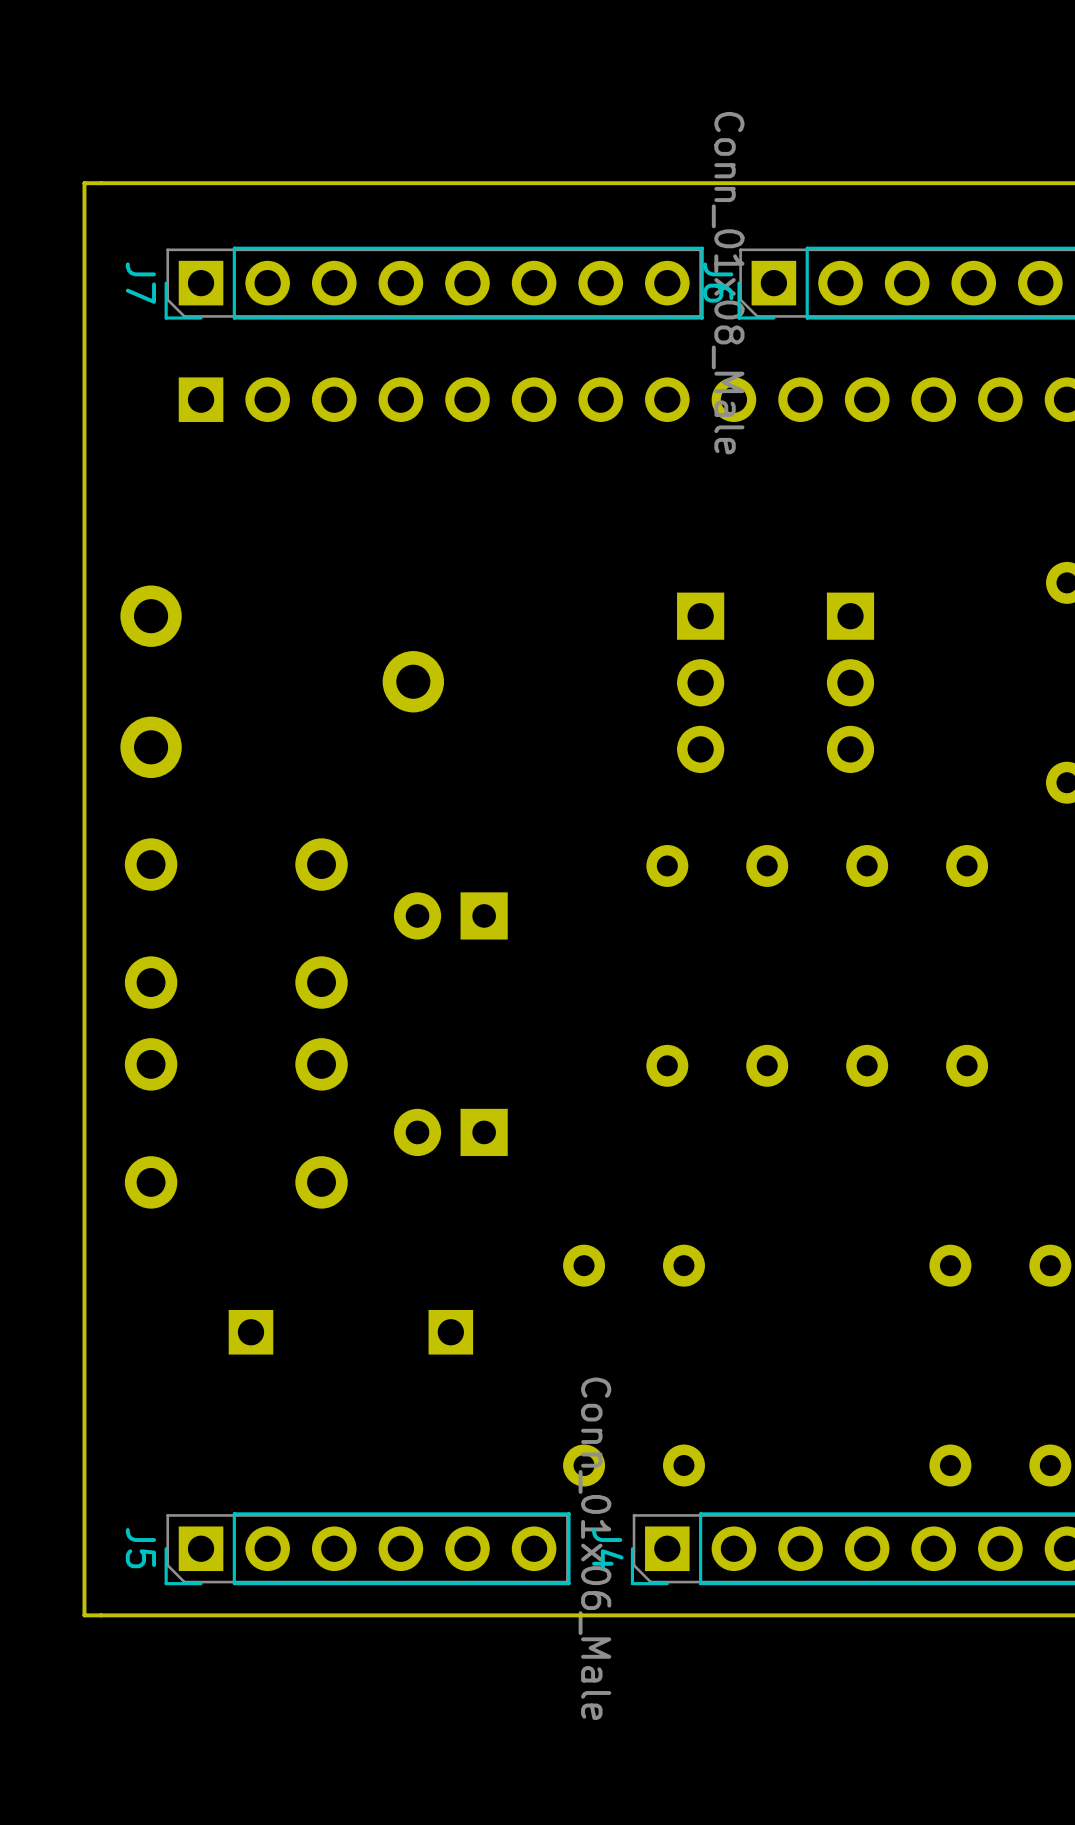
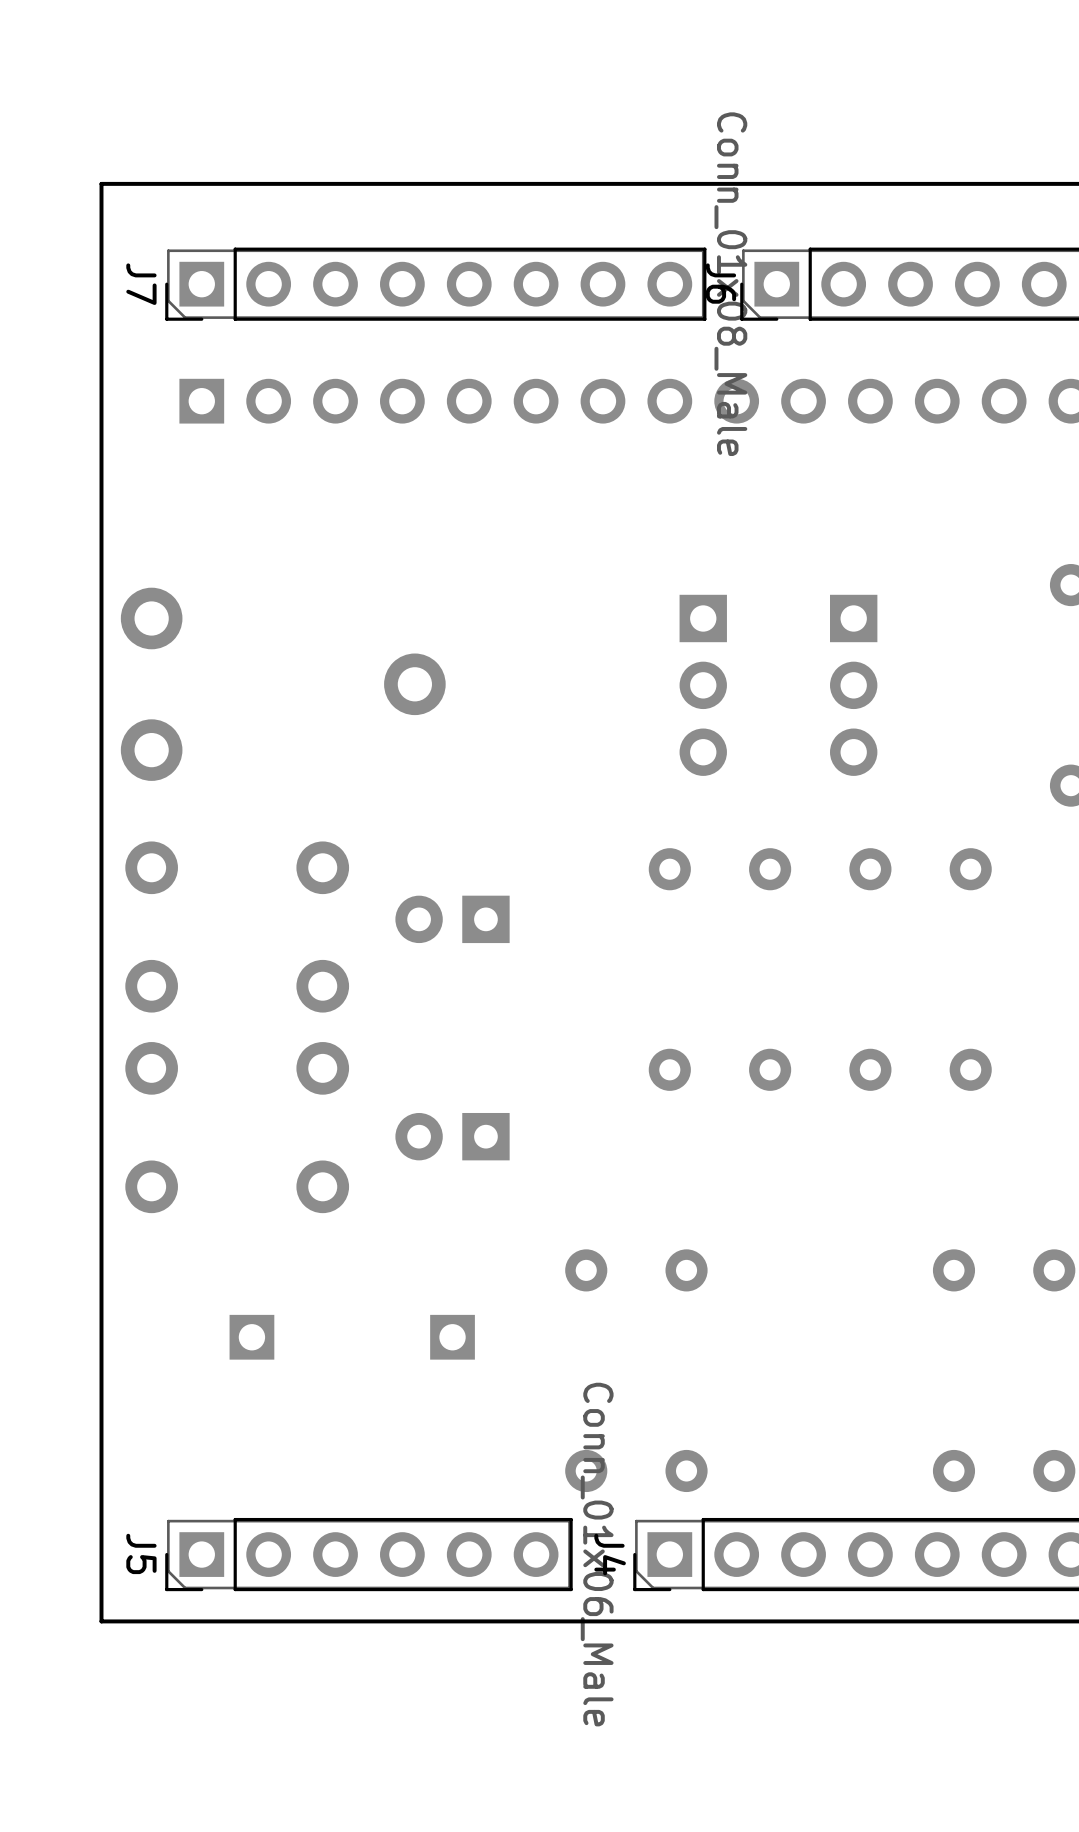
board edge: (101, 183) (84, 183) (84, 1615) (101, 1615) -> (101, 183) (101, 1621)

